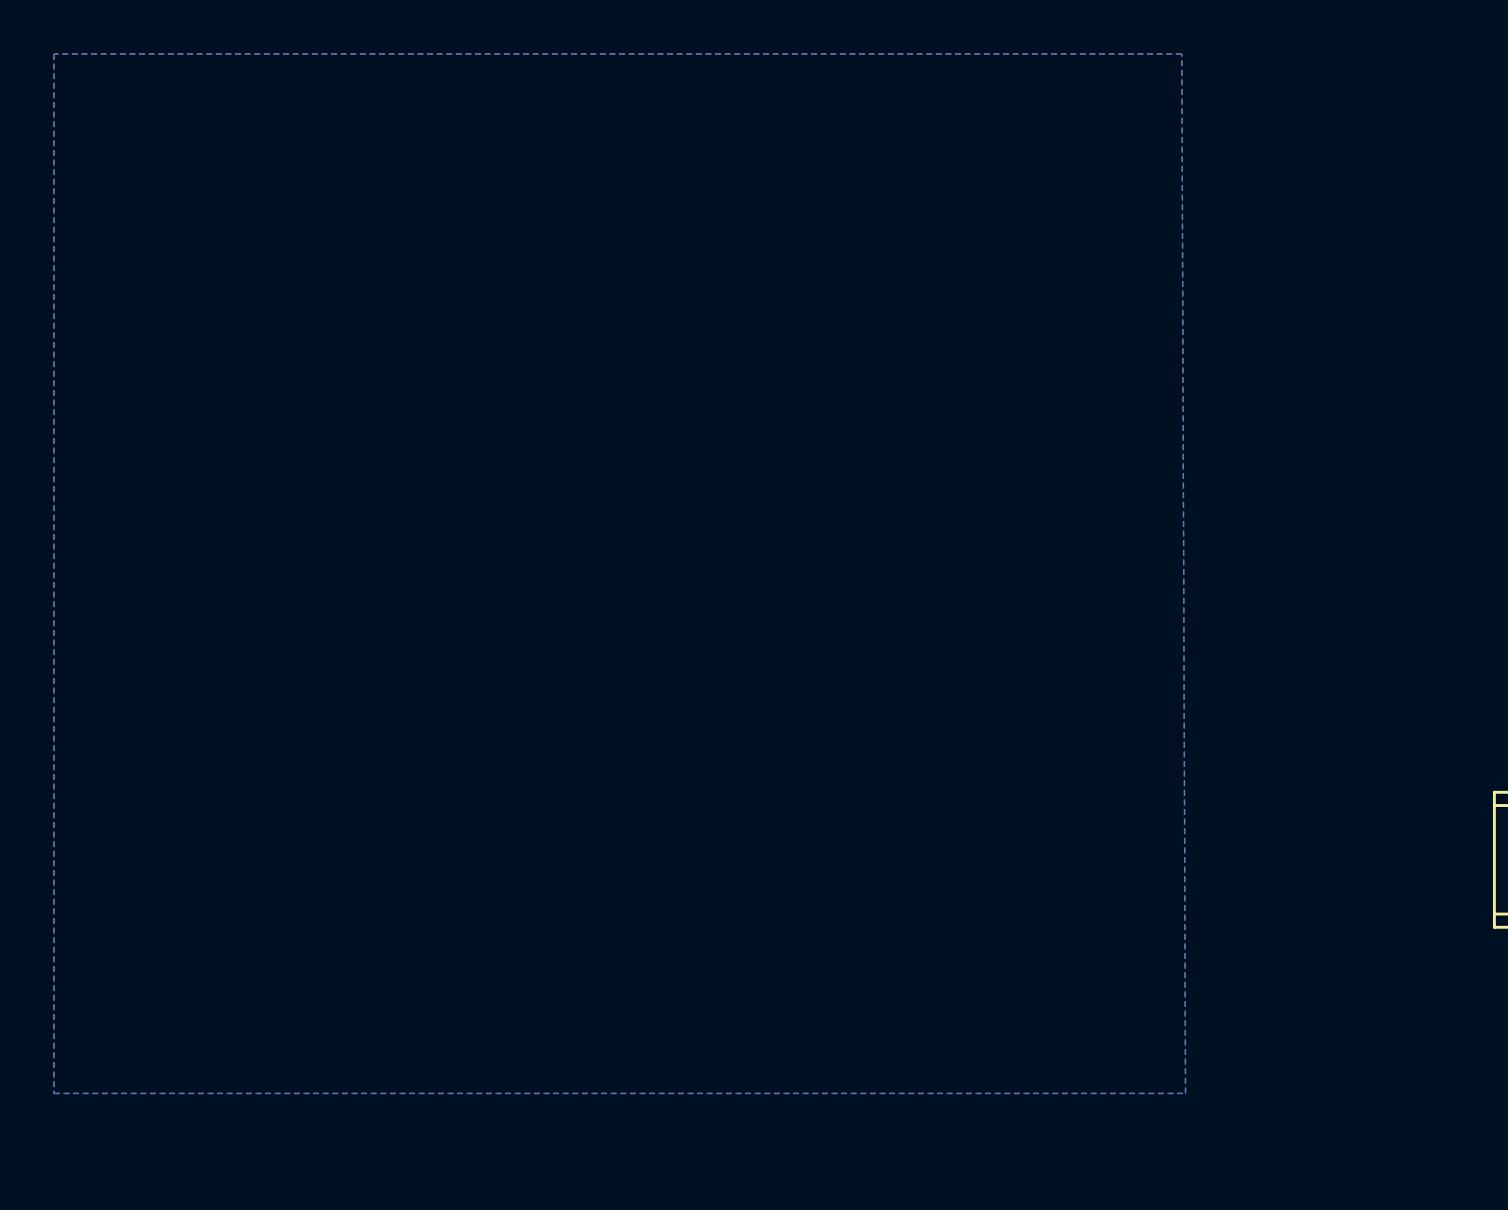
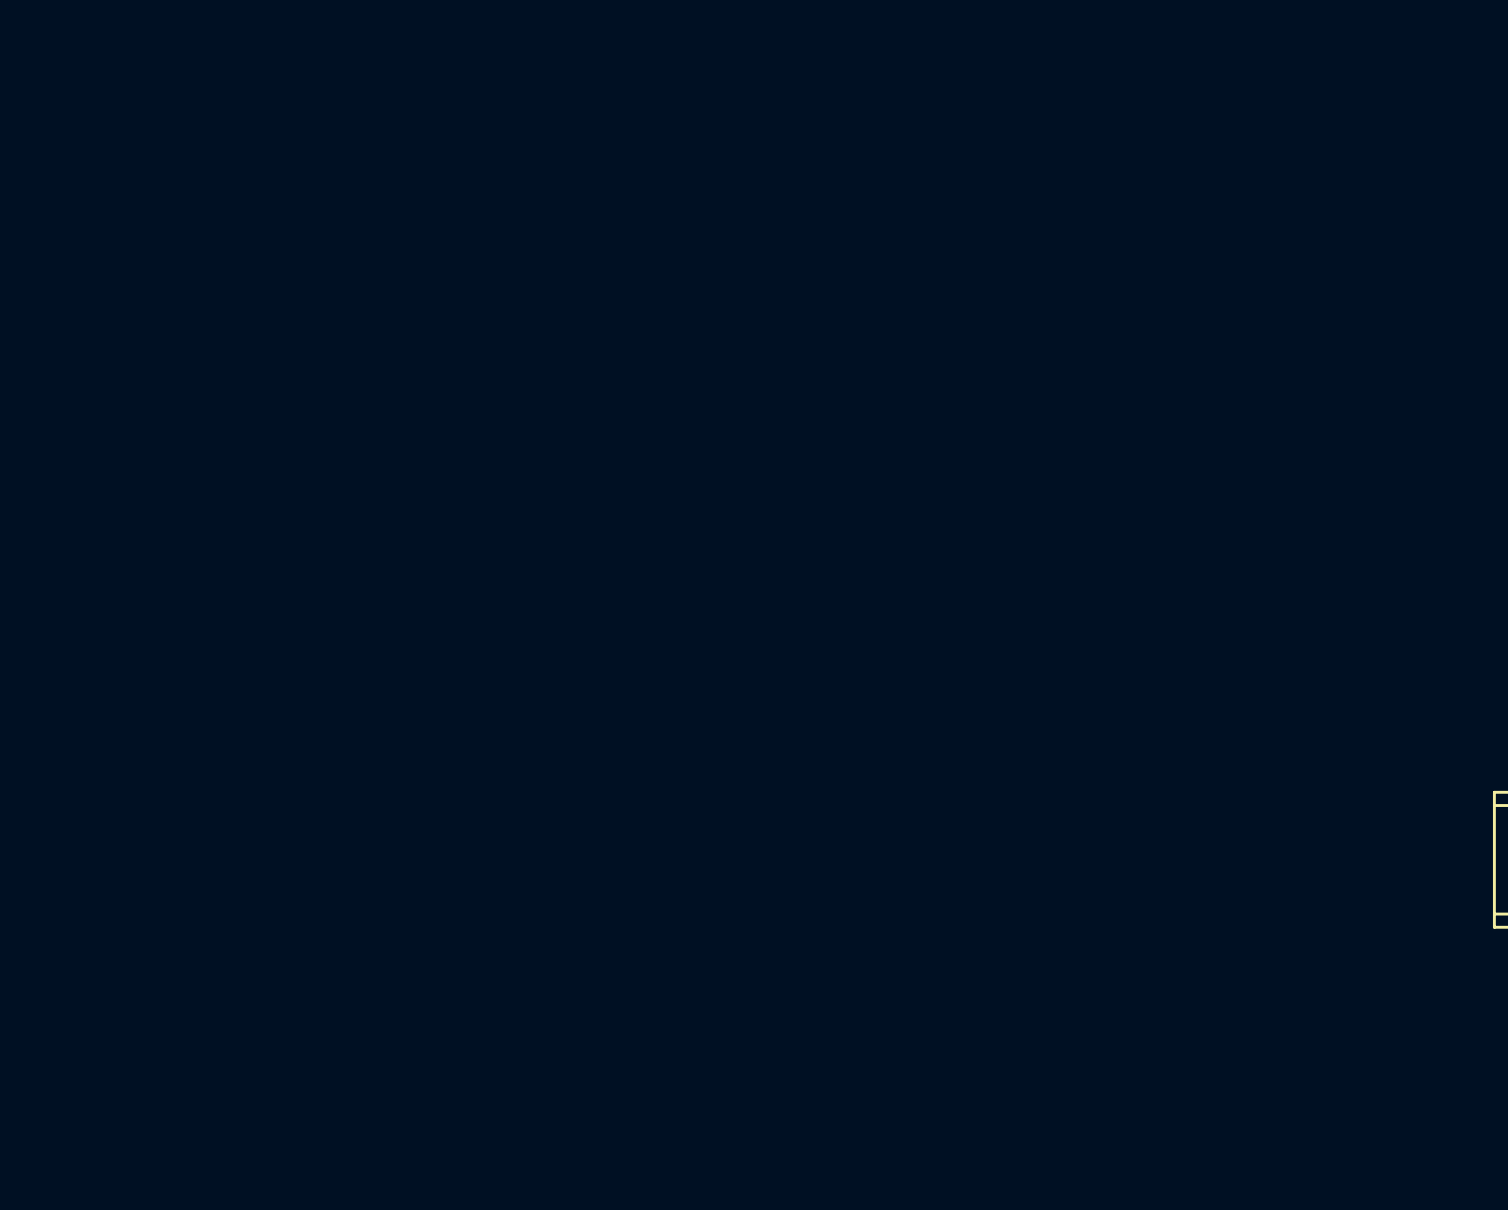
bottom zone outline: (1181, 53) (53, 53) (53, 1093) (1185, 1093) (1181, 53) -> none
top zone outline: (1181, 53) (53, 53) (53, 1093) (1185, 1093) (1181, 53) -> none

